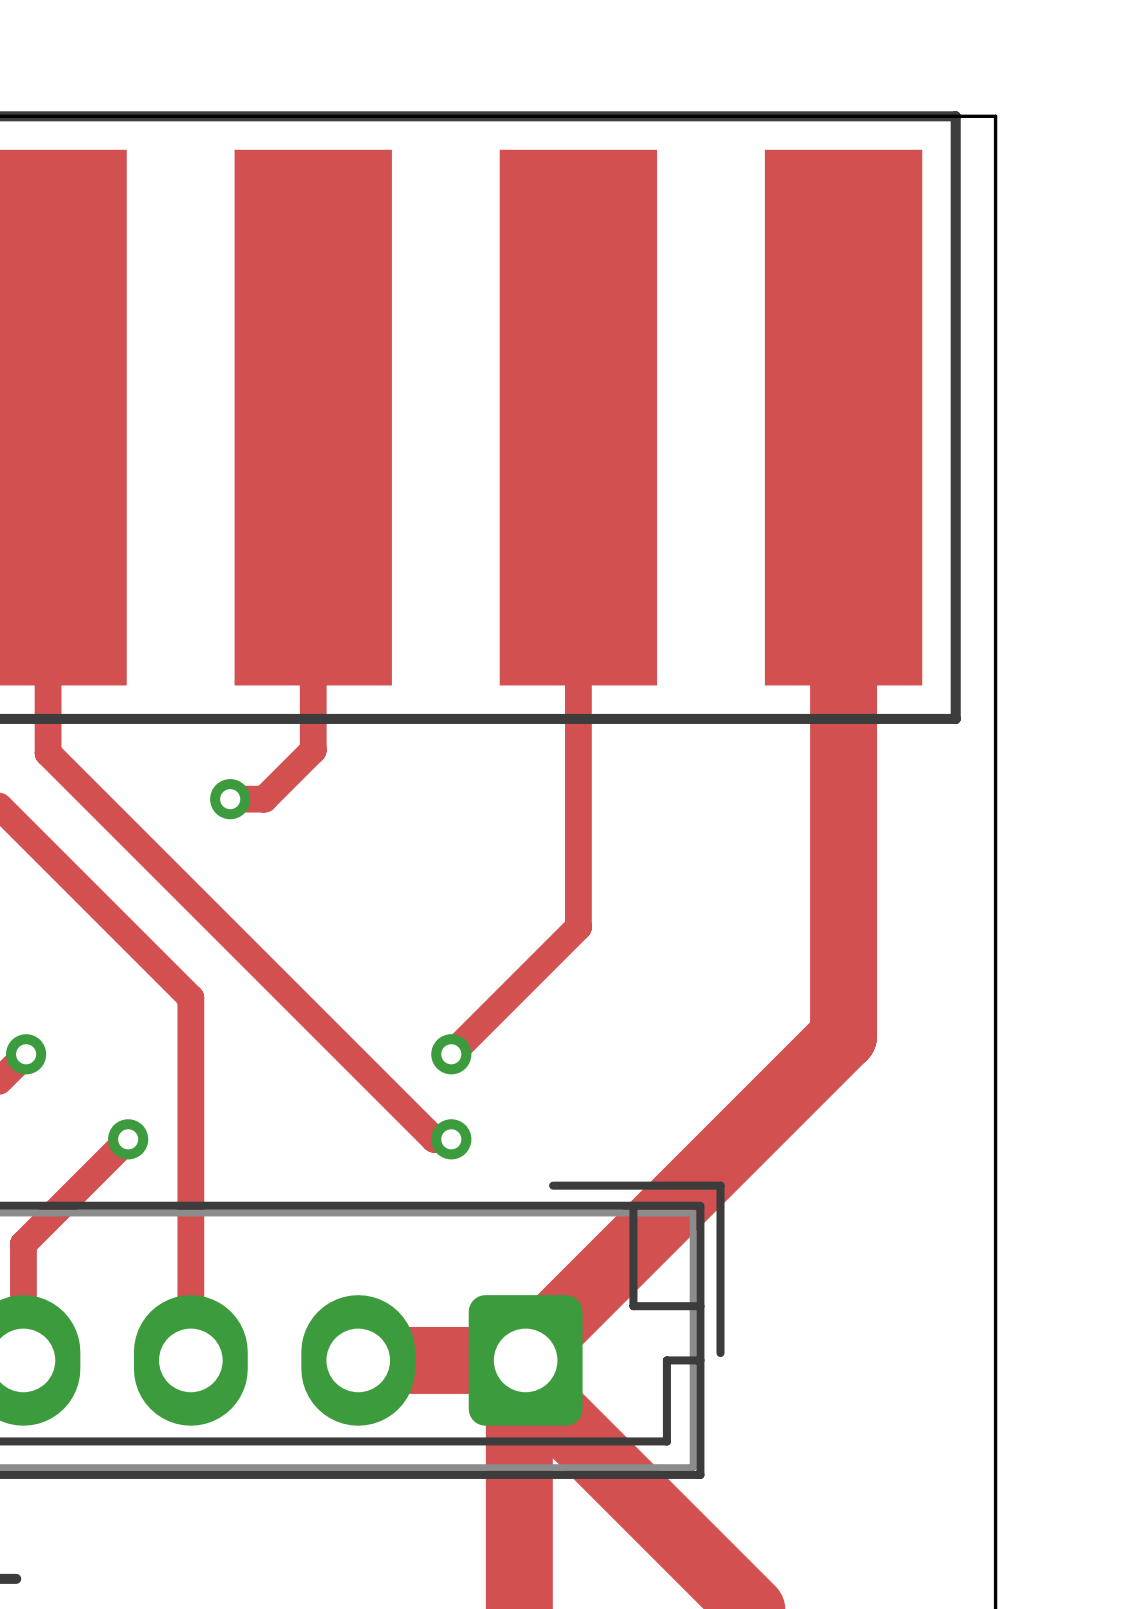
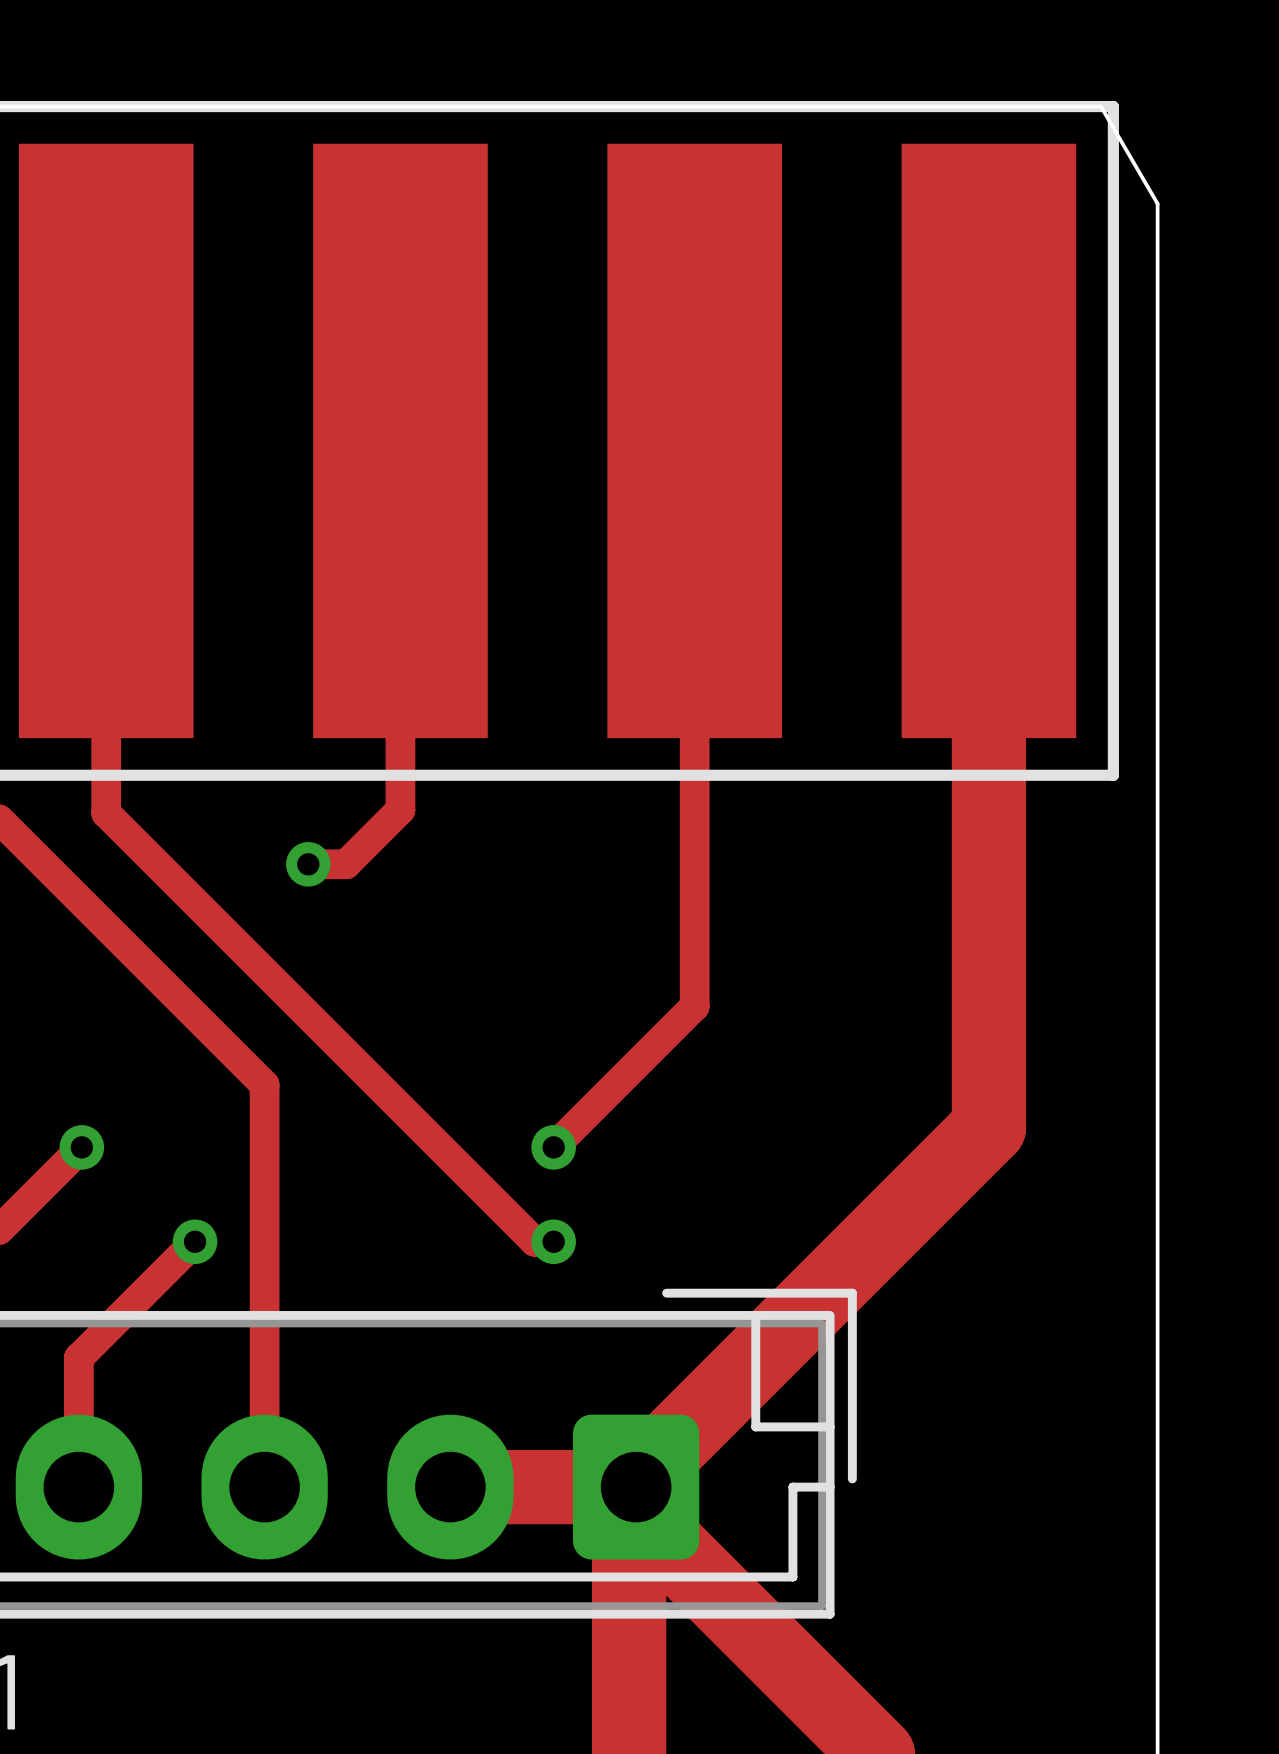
board edge: (944, 116) (995, 116) (995, 203) -> (1100, 106) (1157, 203)

